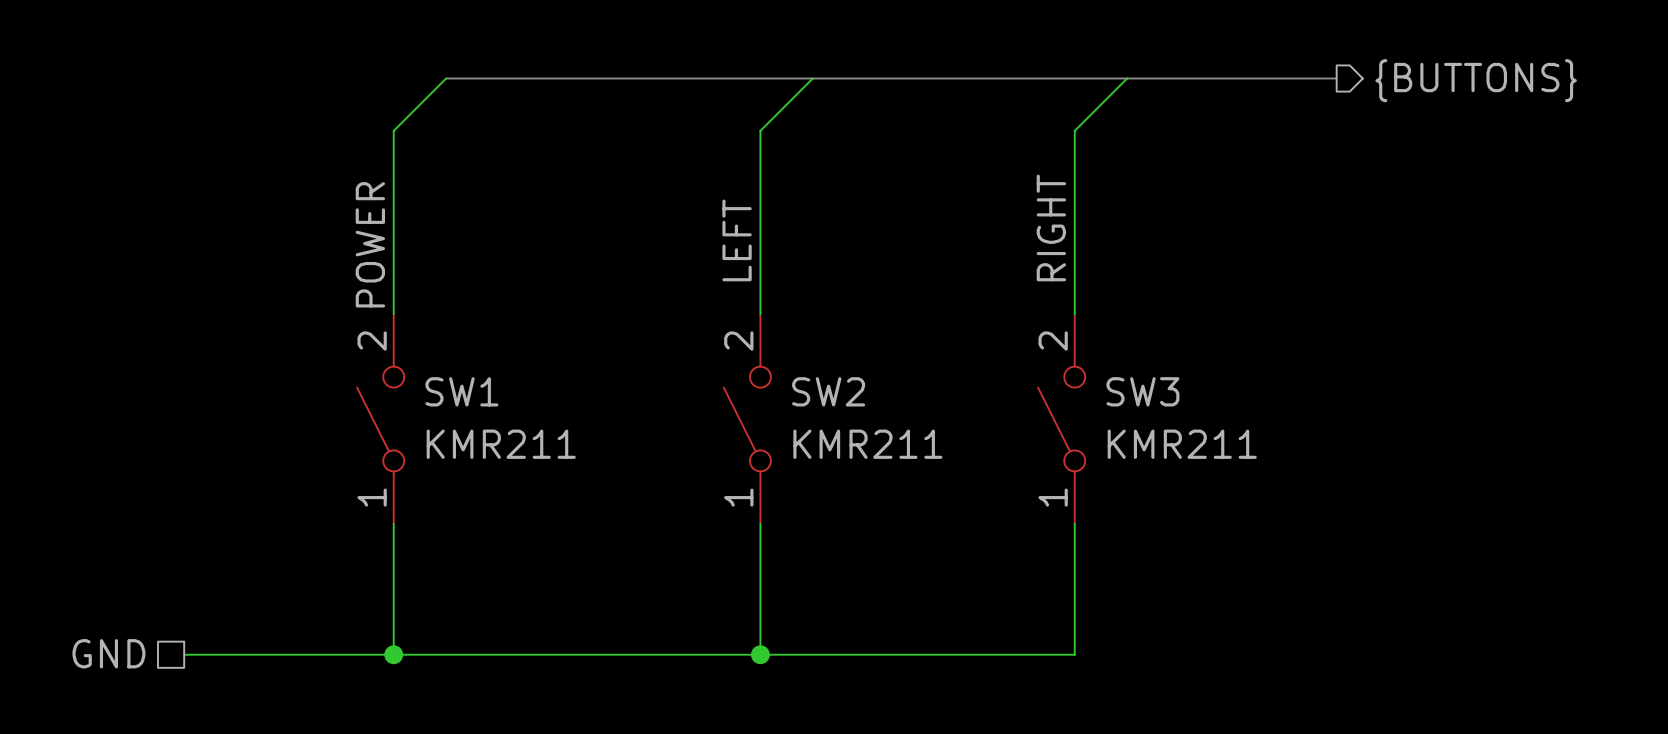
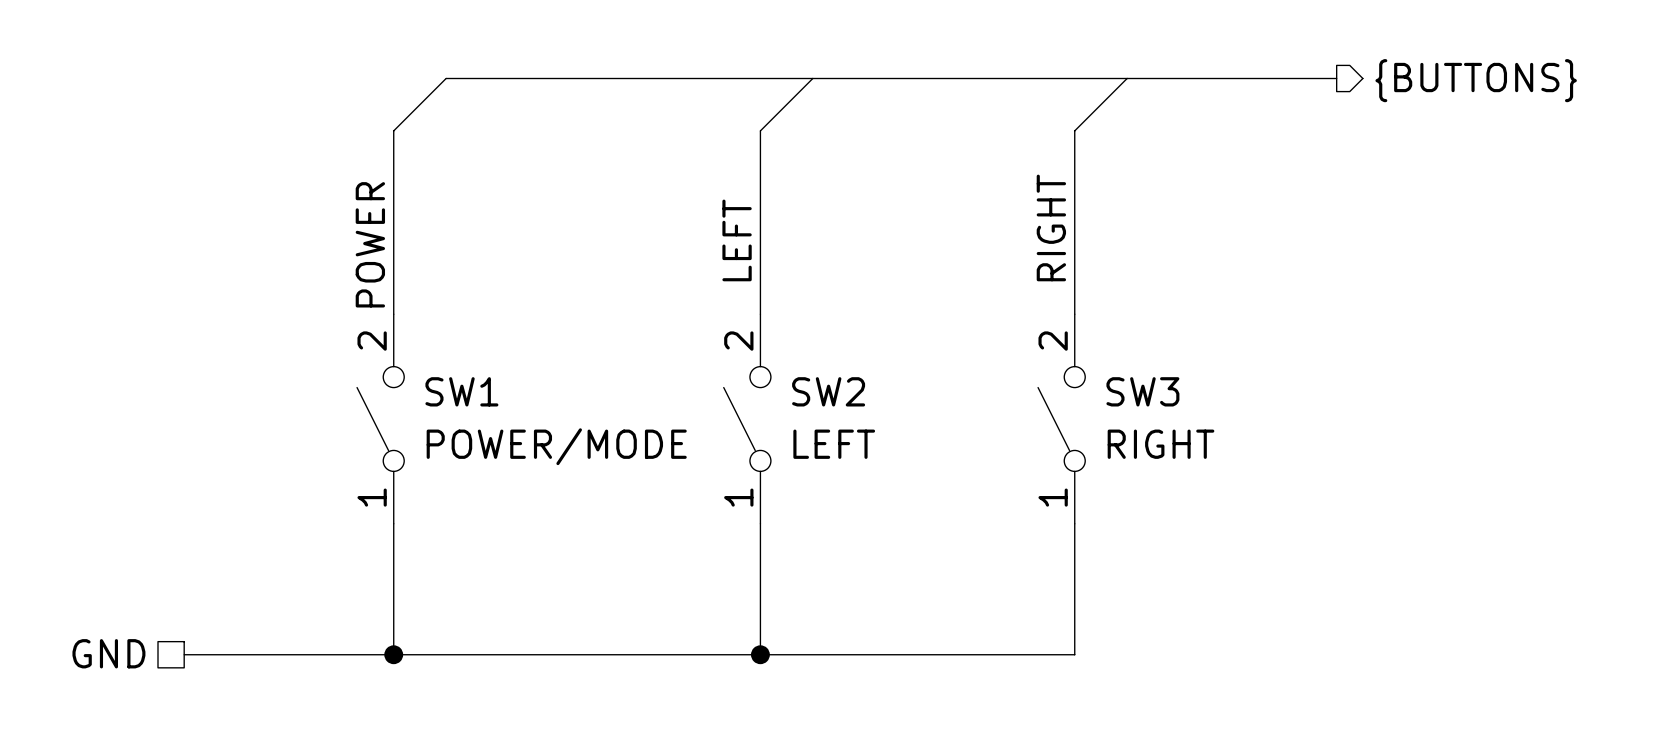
SW1 value: KMR211 (501, 444) -> POWER/MODE (556, 446)
SW2 value: KMR211 (867, 444) -> LEFT (834, 444)
SW3 value: KMR211 (1182, 444) -> RIGHT (1161, 444)

